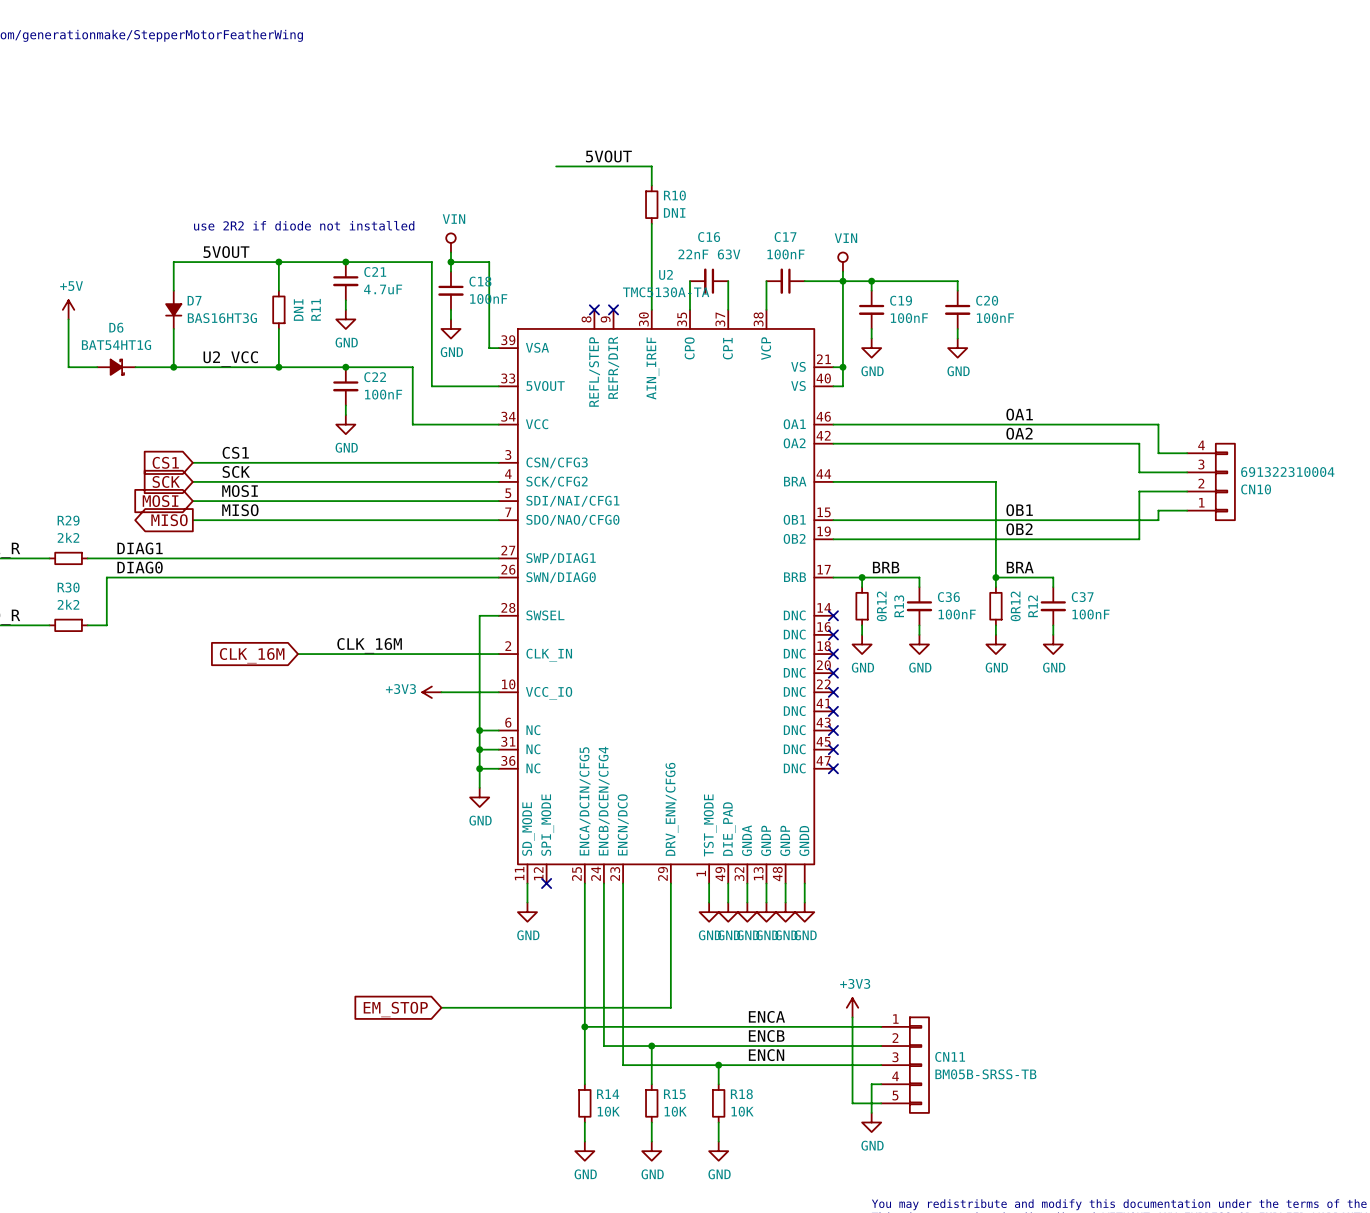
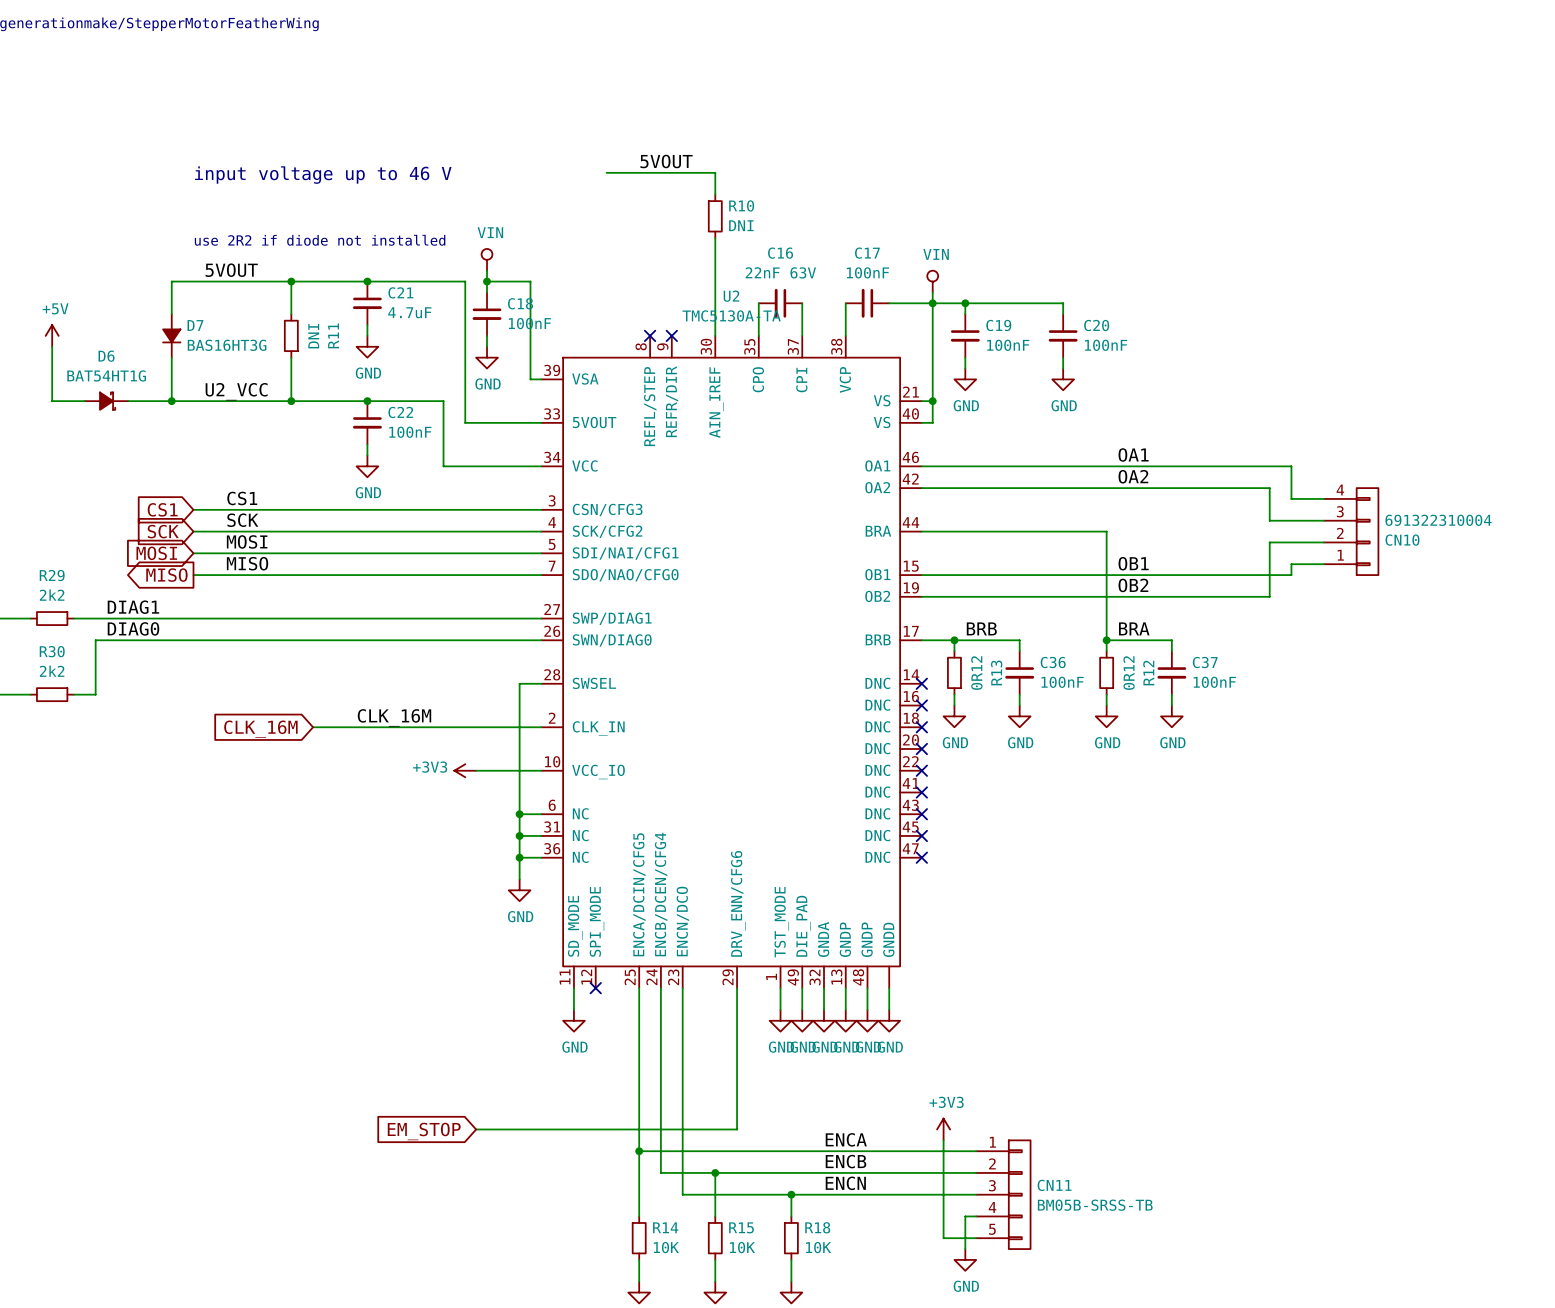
text: none -> input voltage up to 46 V (323, 175)

